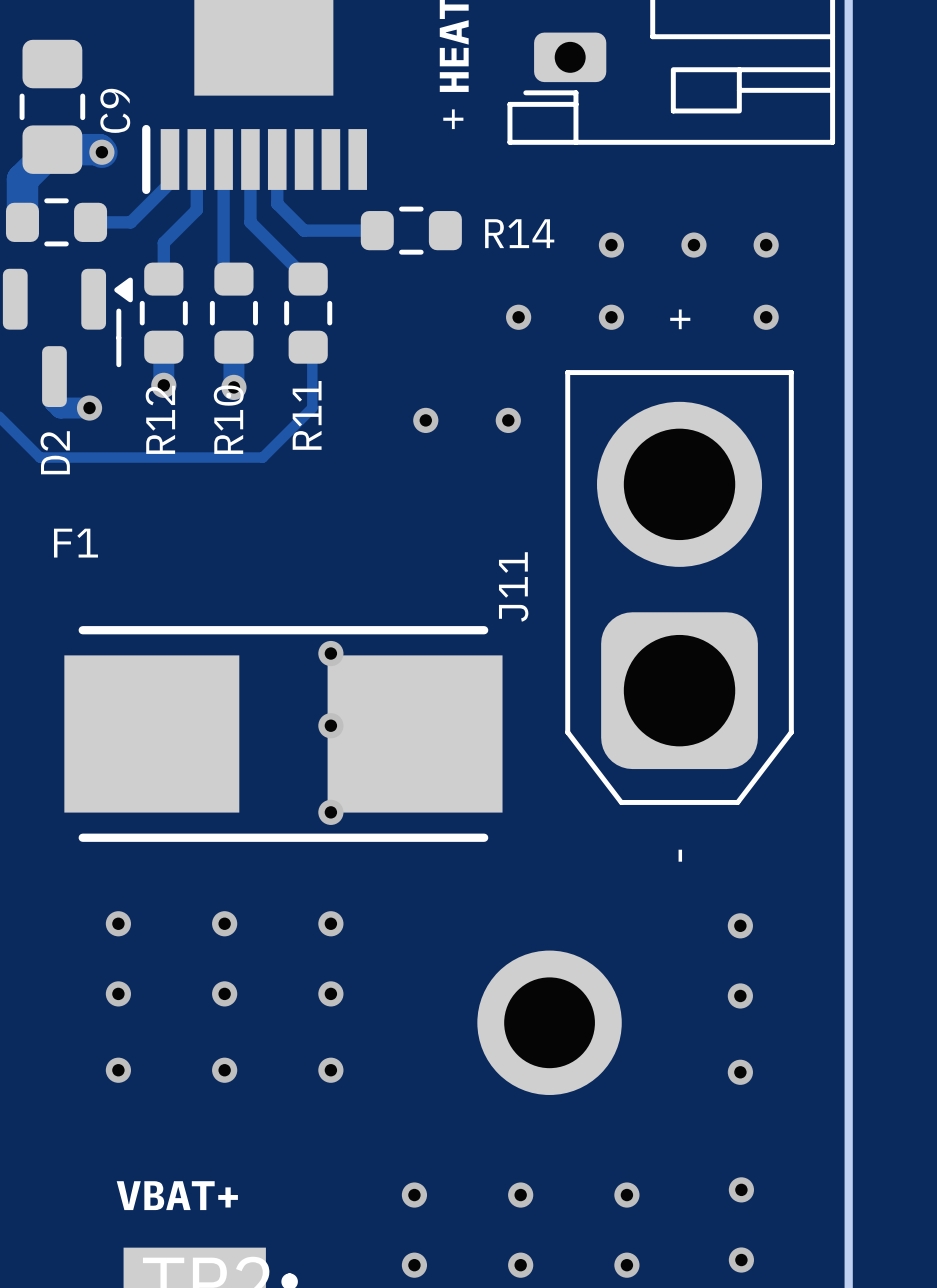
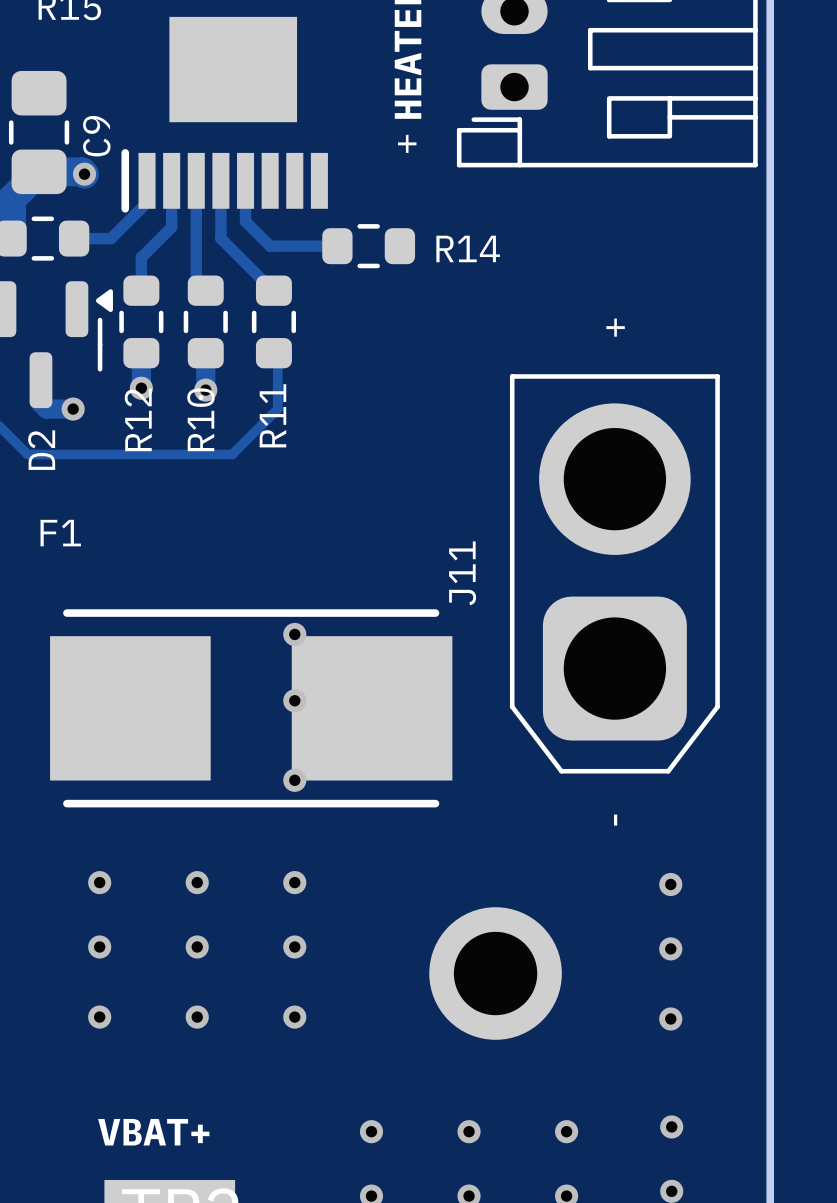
via: (611, 245) -> none
via: (693, 245) -> none
via: (766, 245) -> none
via: (518, 317) -> none
via: (611, 317) -> none
via: (766, 317) -> none
via: (425, 420) -> none
via: (508, 420) -> none

